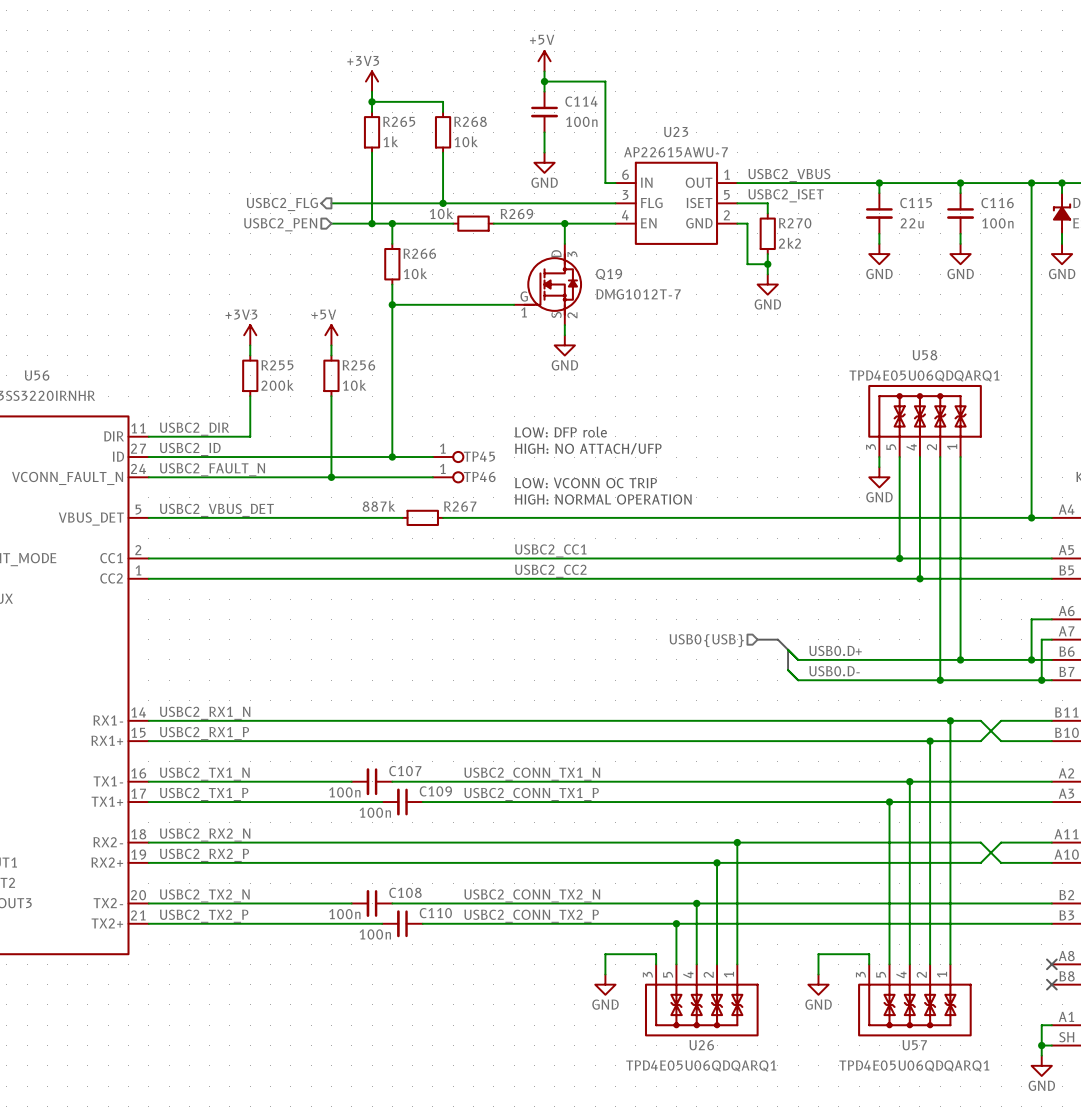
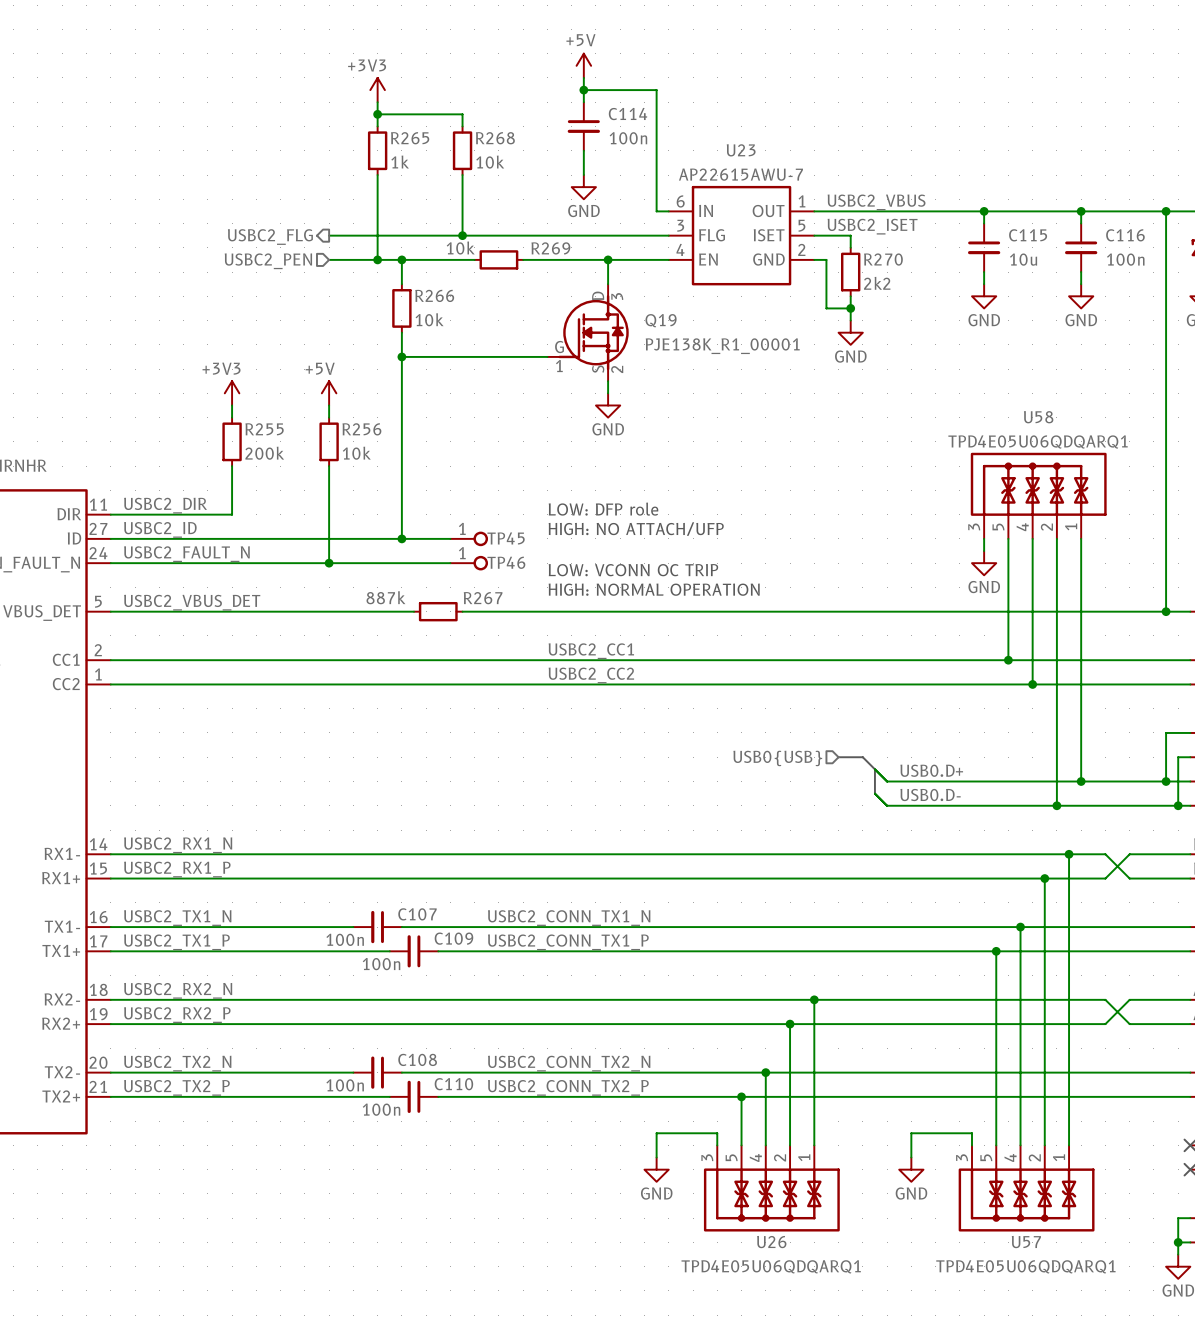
C115 text: 22u (912, 223) -> 10u (1023, 259)
Q19 text: DMG1012T-7 (638, 294) -> PJE138K_R1_00001 (722, 346)

